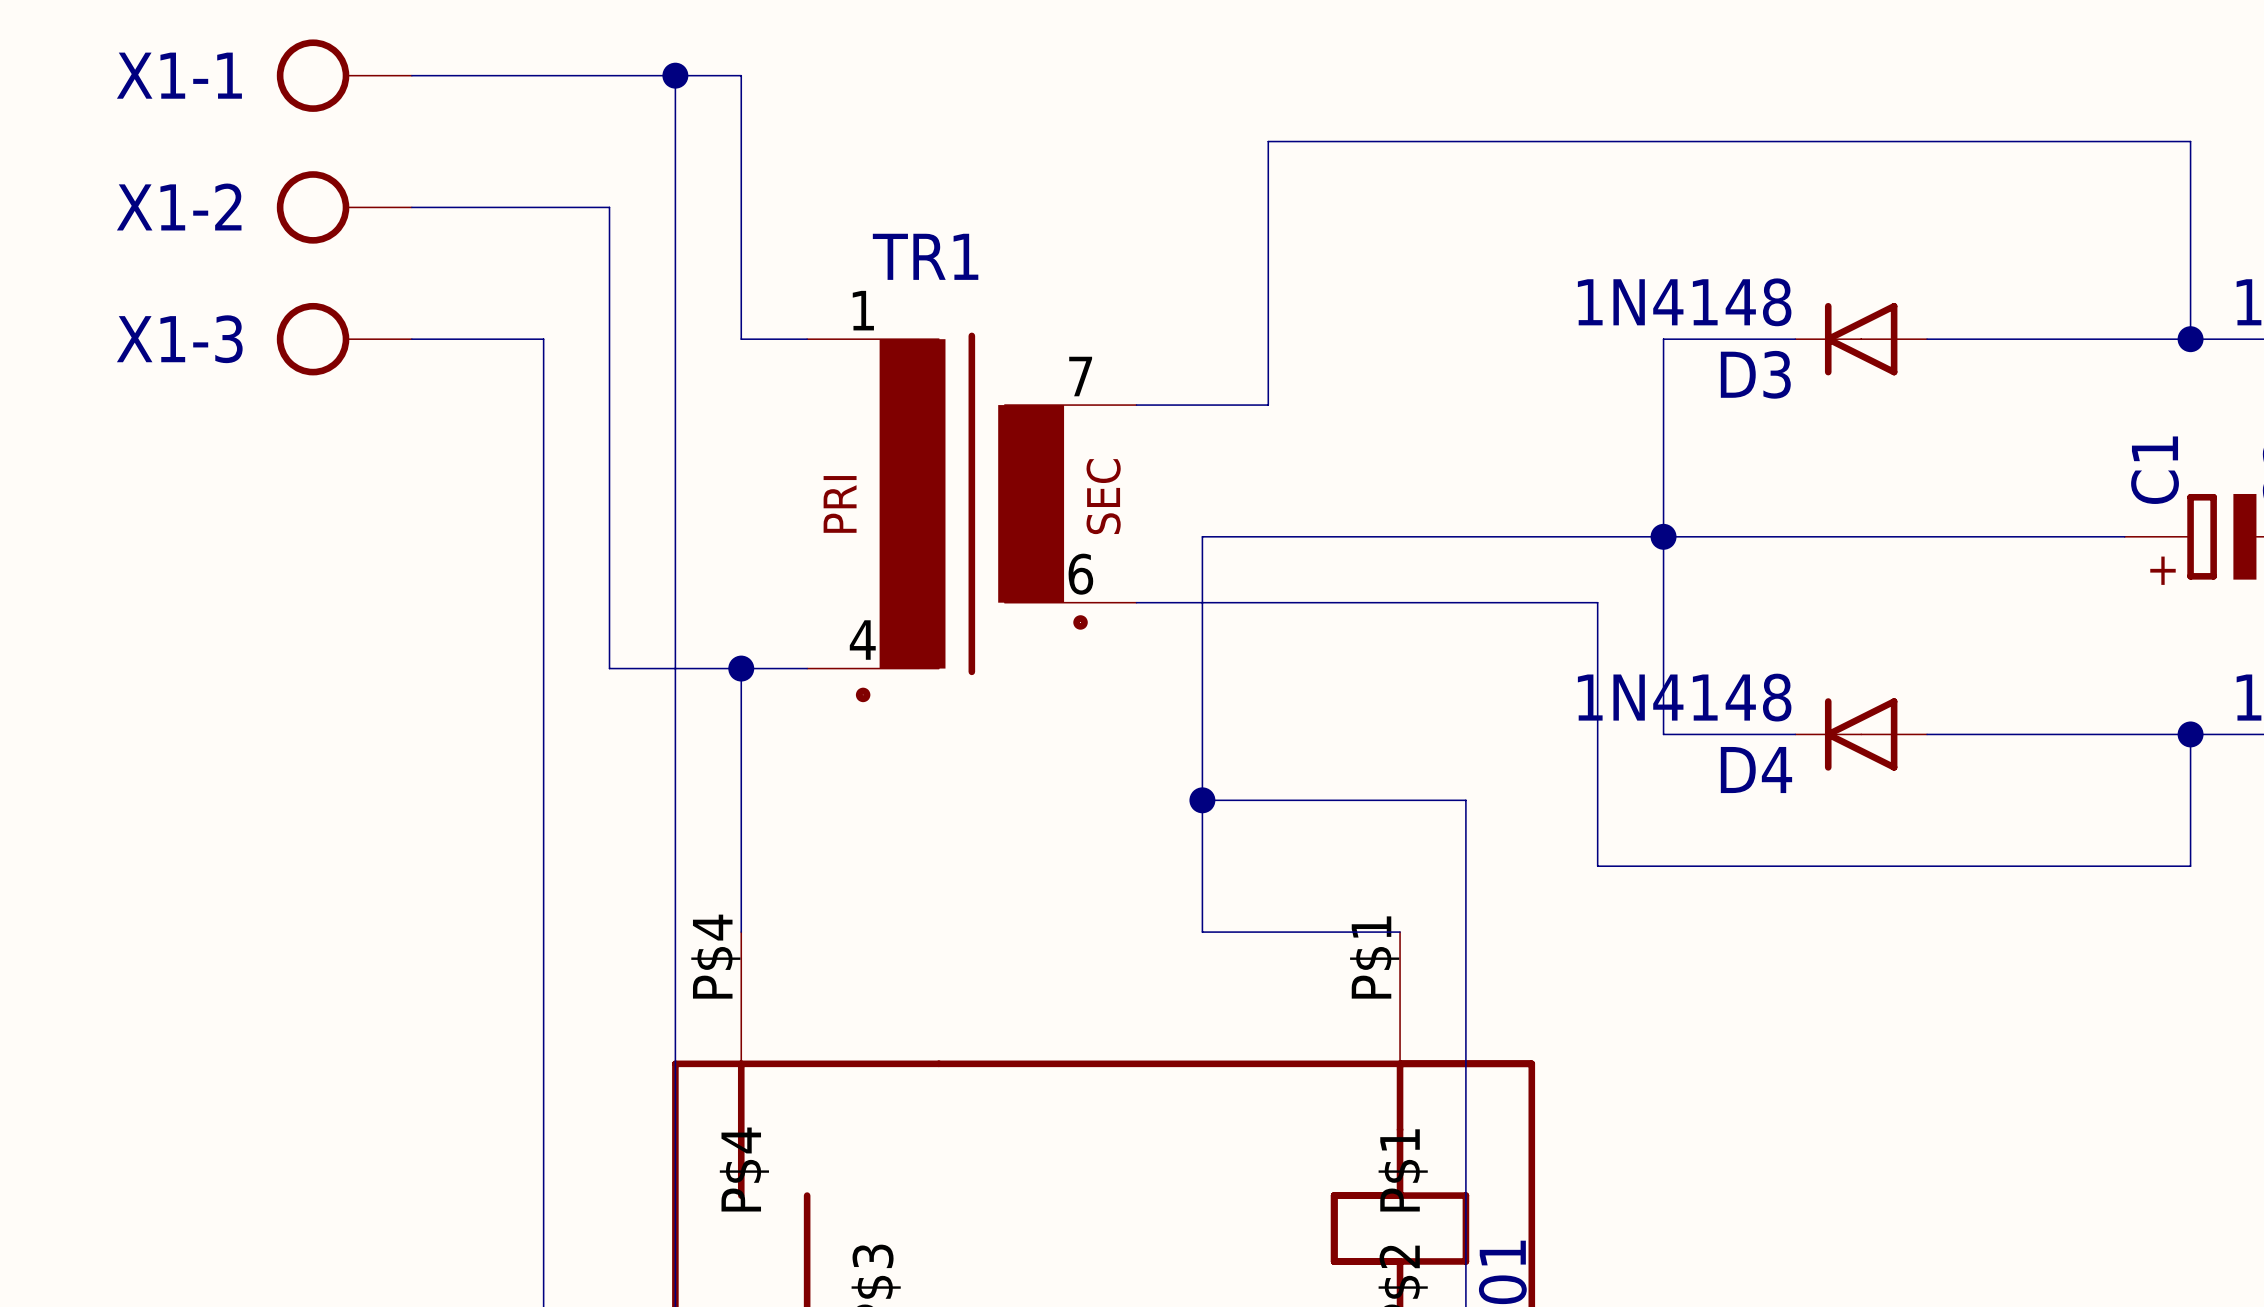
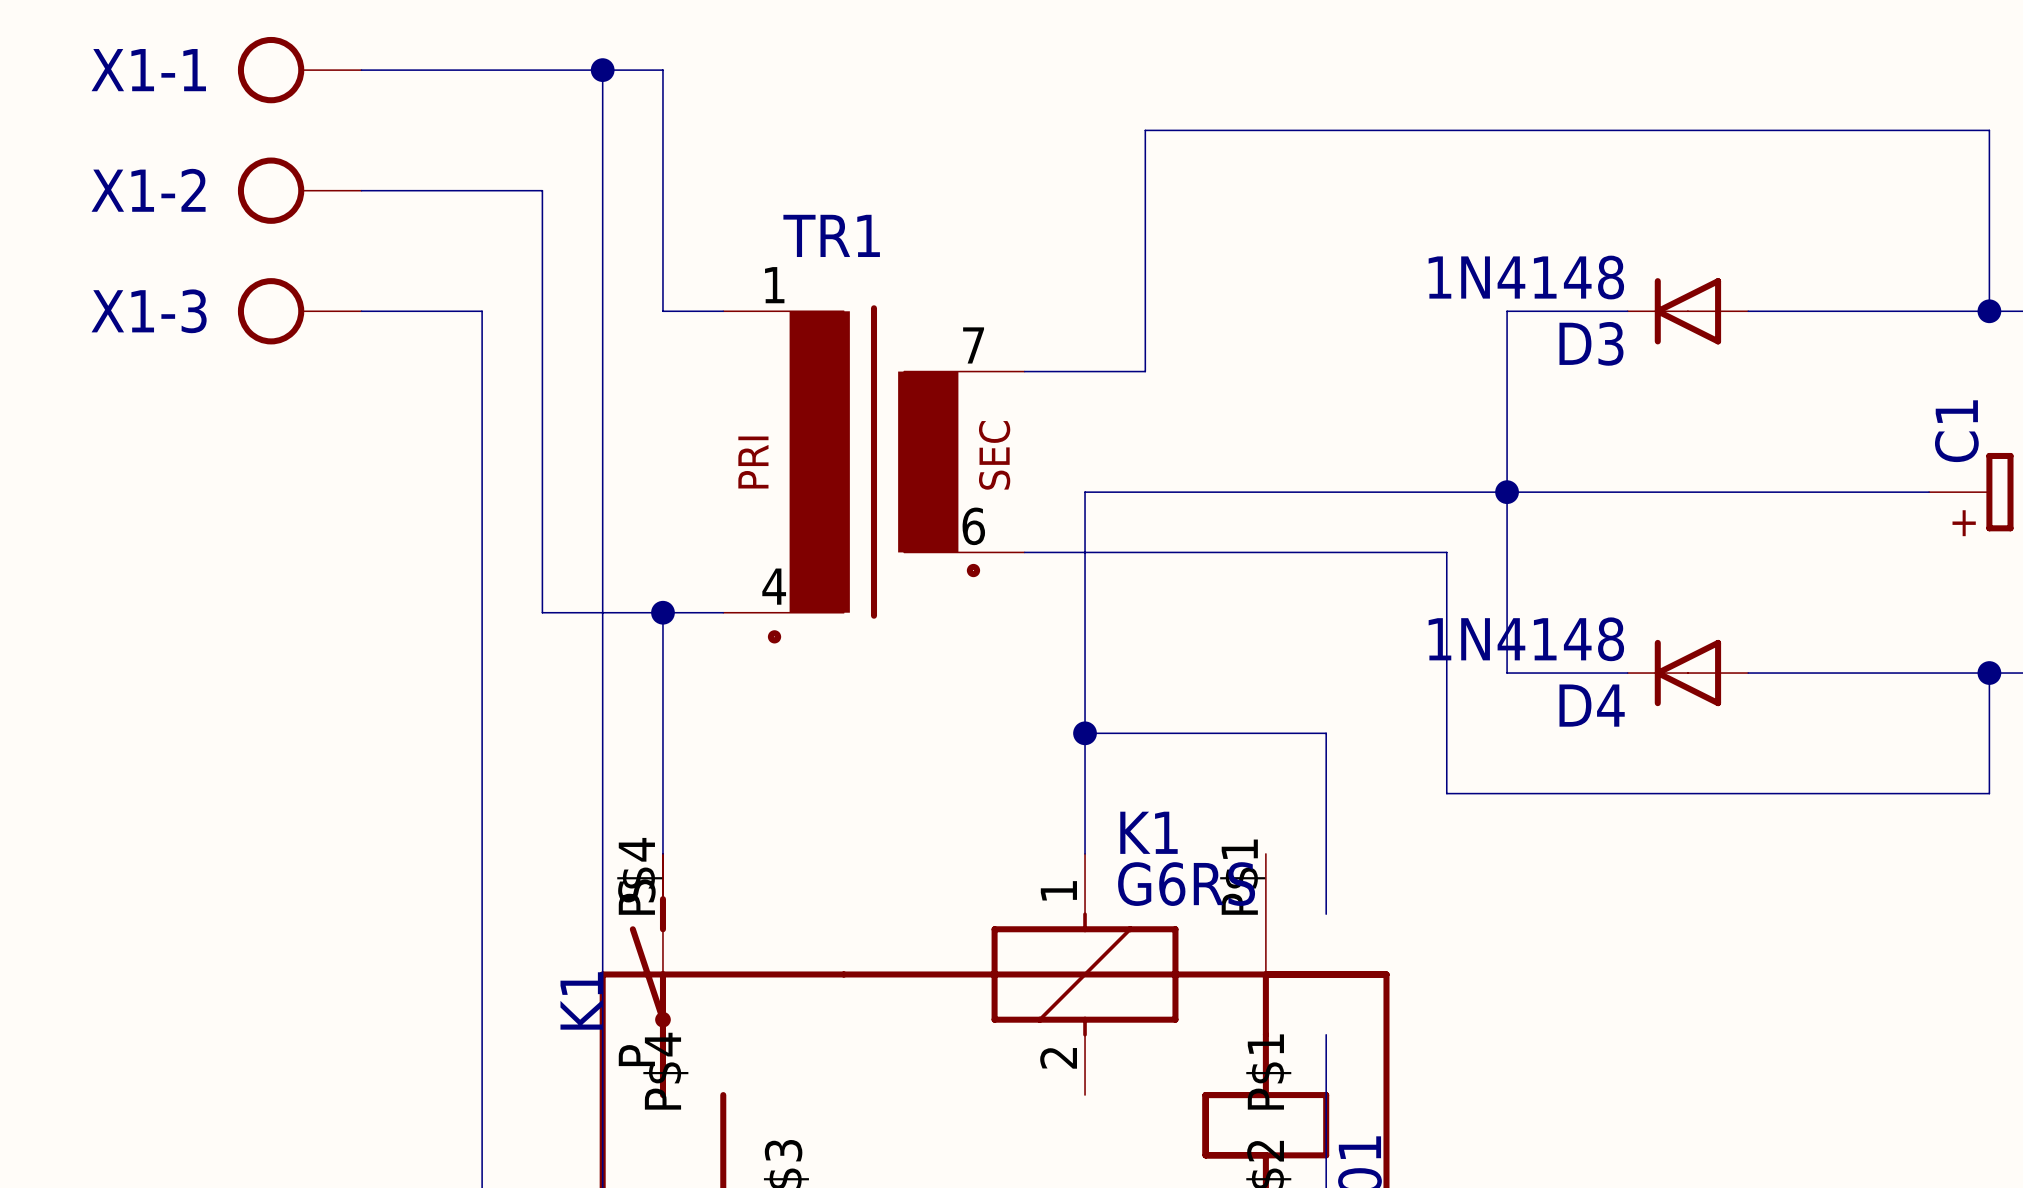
wire: (1202, 932) (1400, 932) -> none
wire: (1465, 997) (1465, 1129) -> none
K1: none -> (650, 974)
K1: none -> G6RS (1085, 974)

